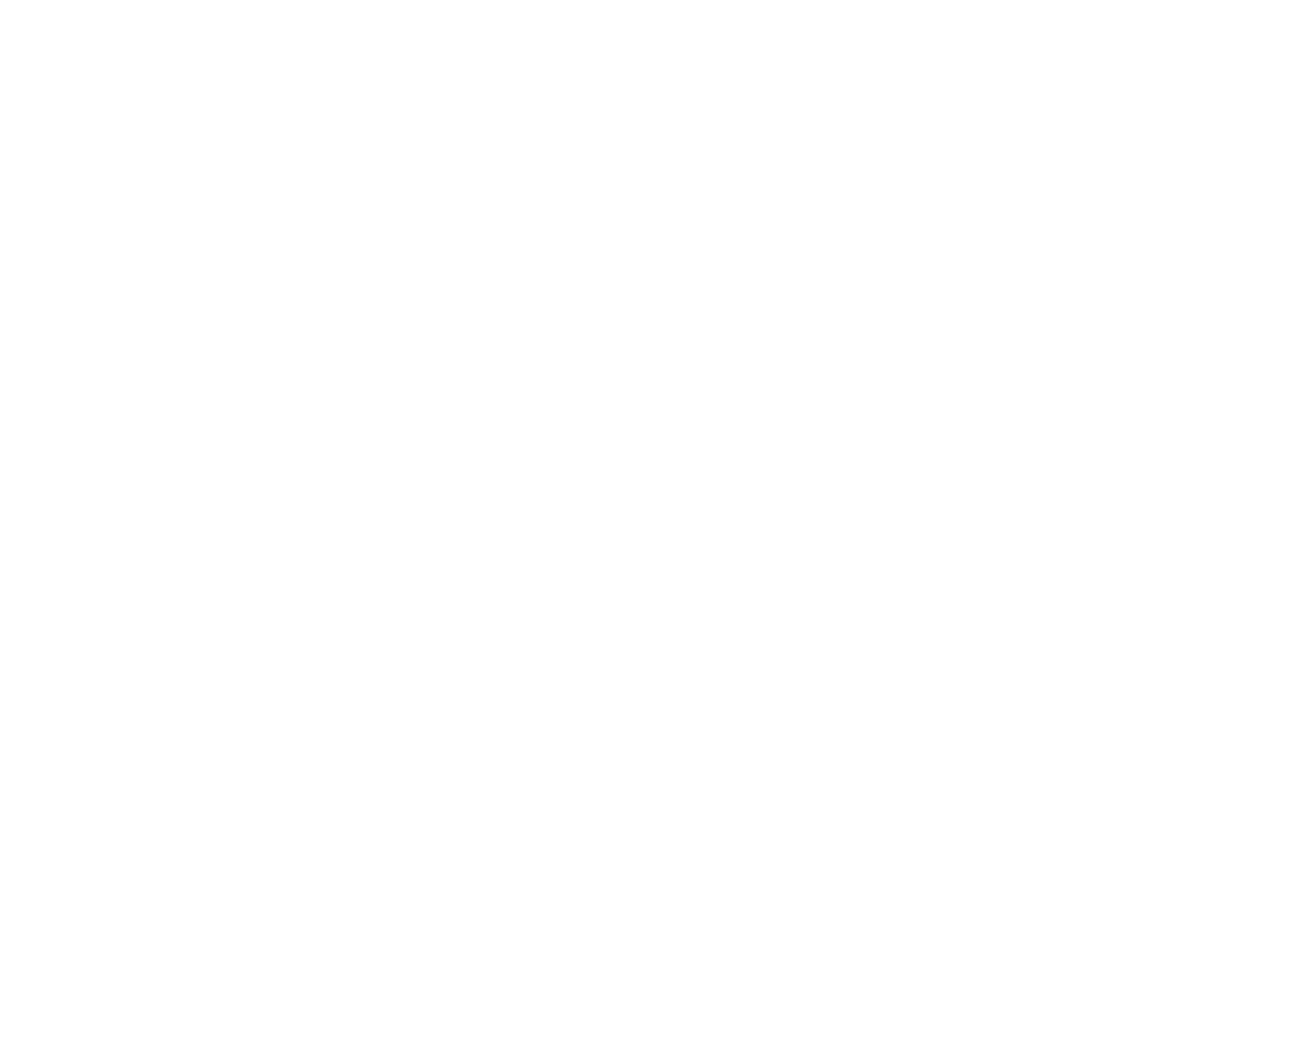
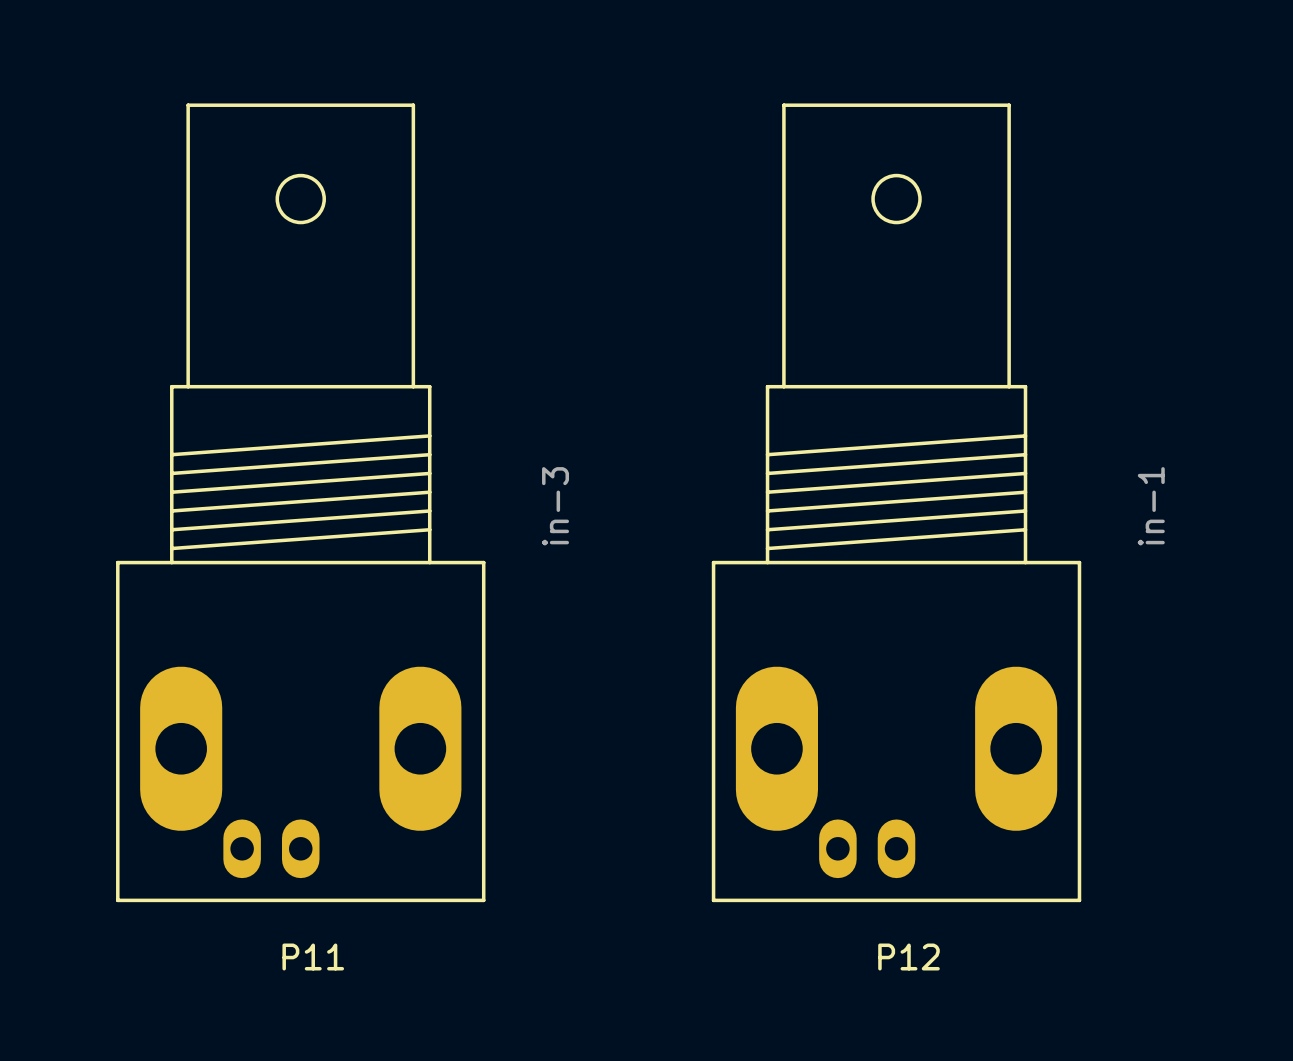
P11: none -> in-3 (300, 502)
P12: none -> in-1 (896, 502)

